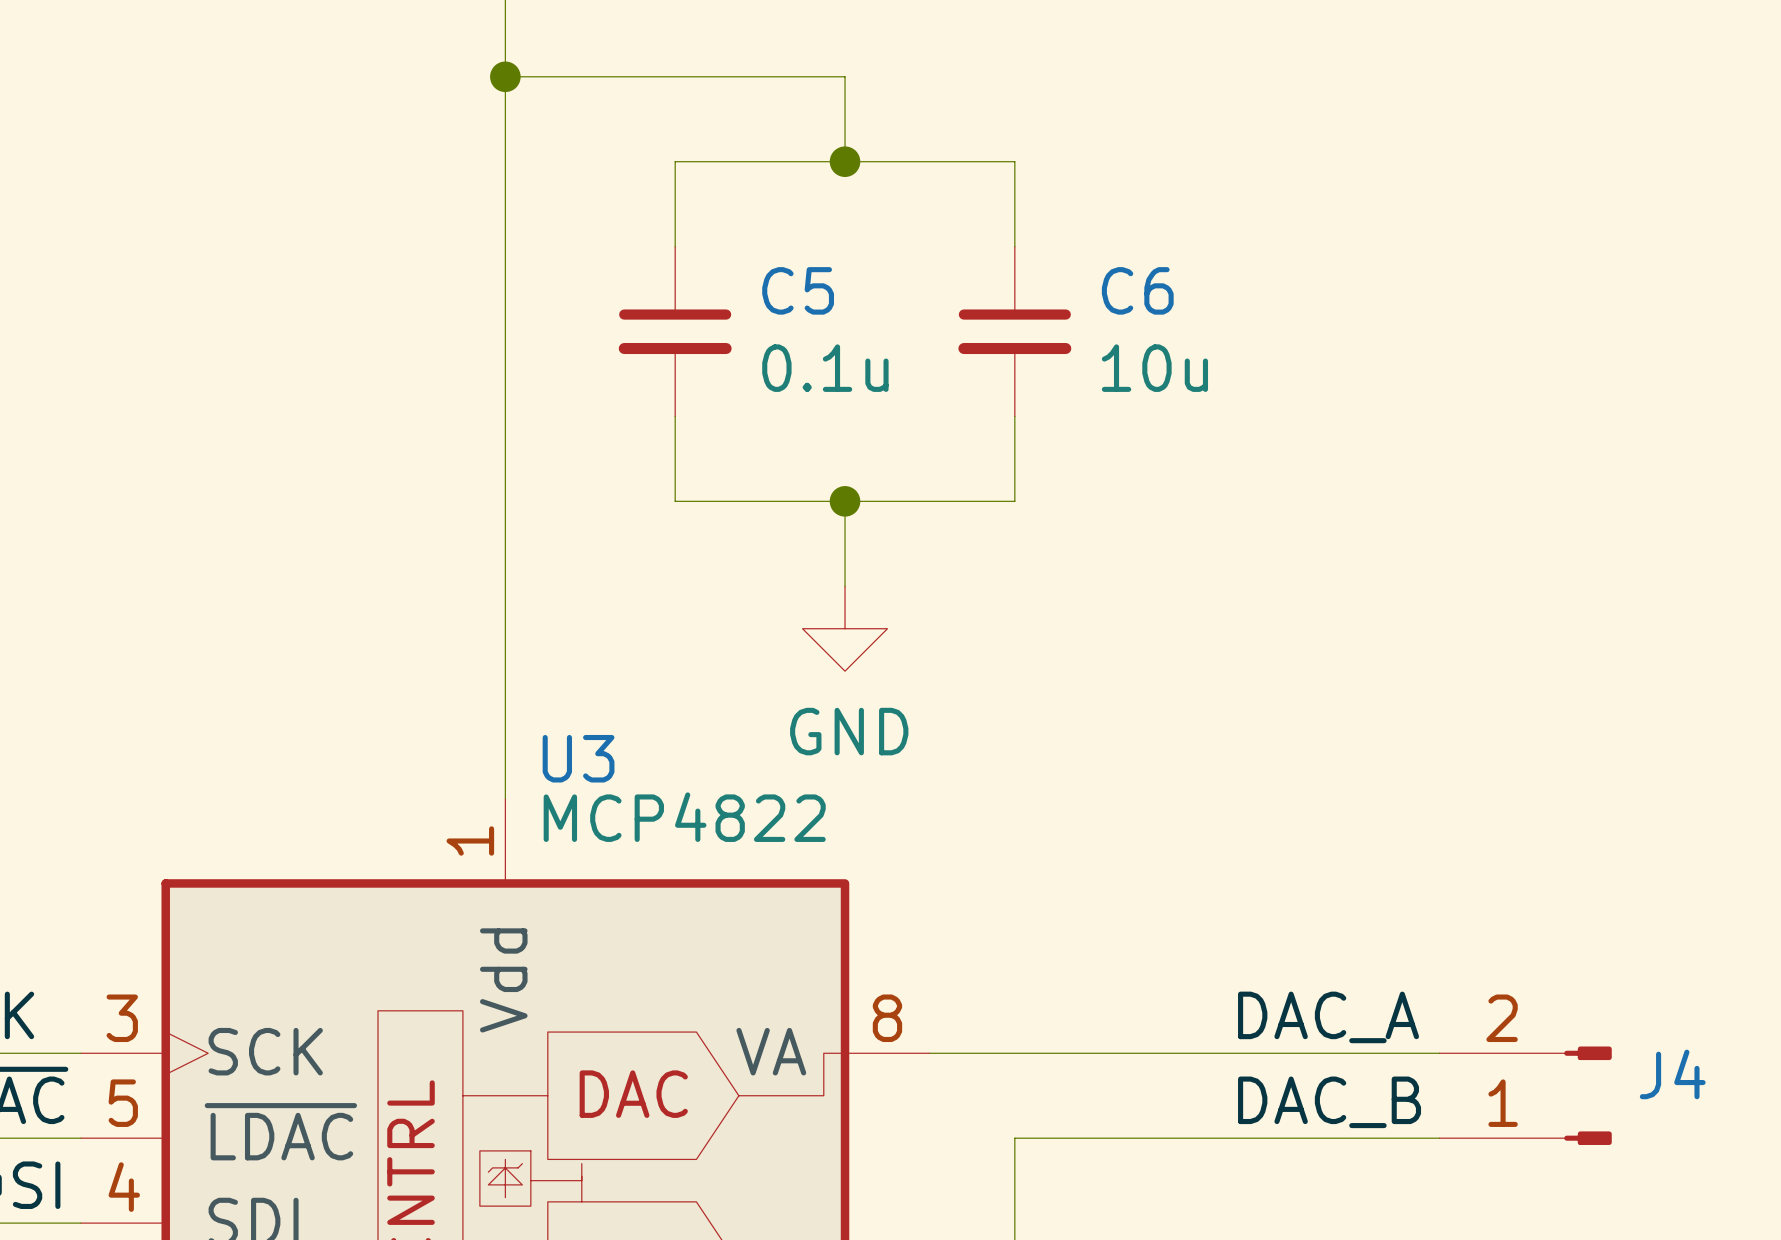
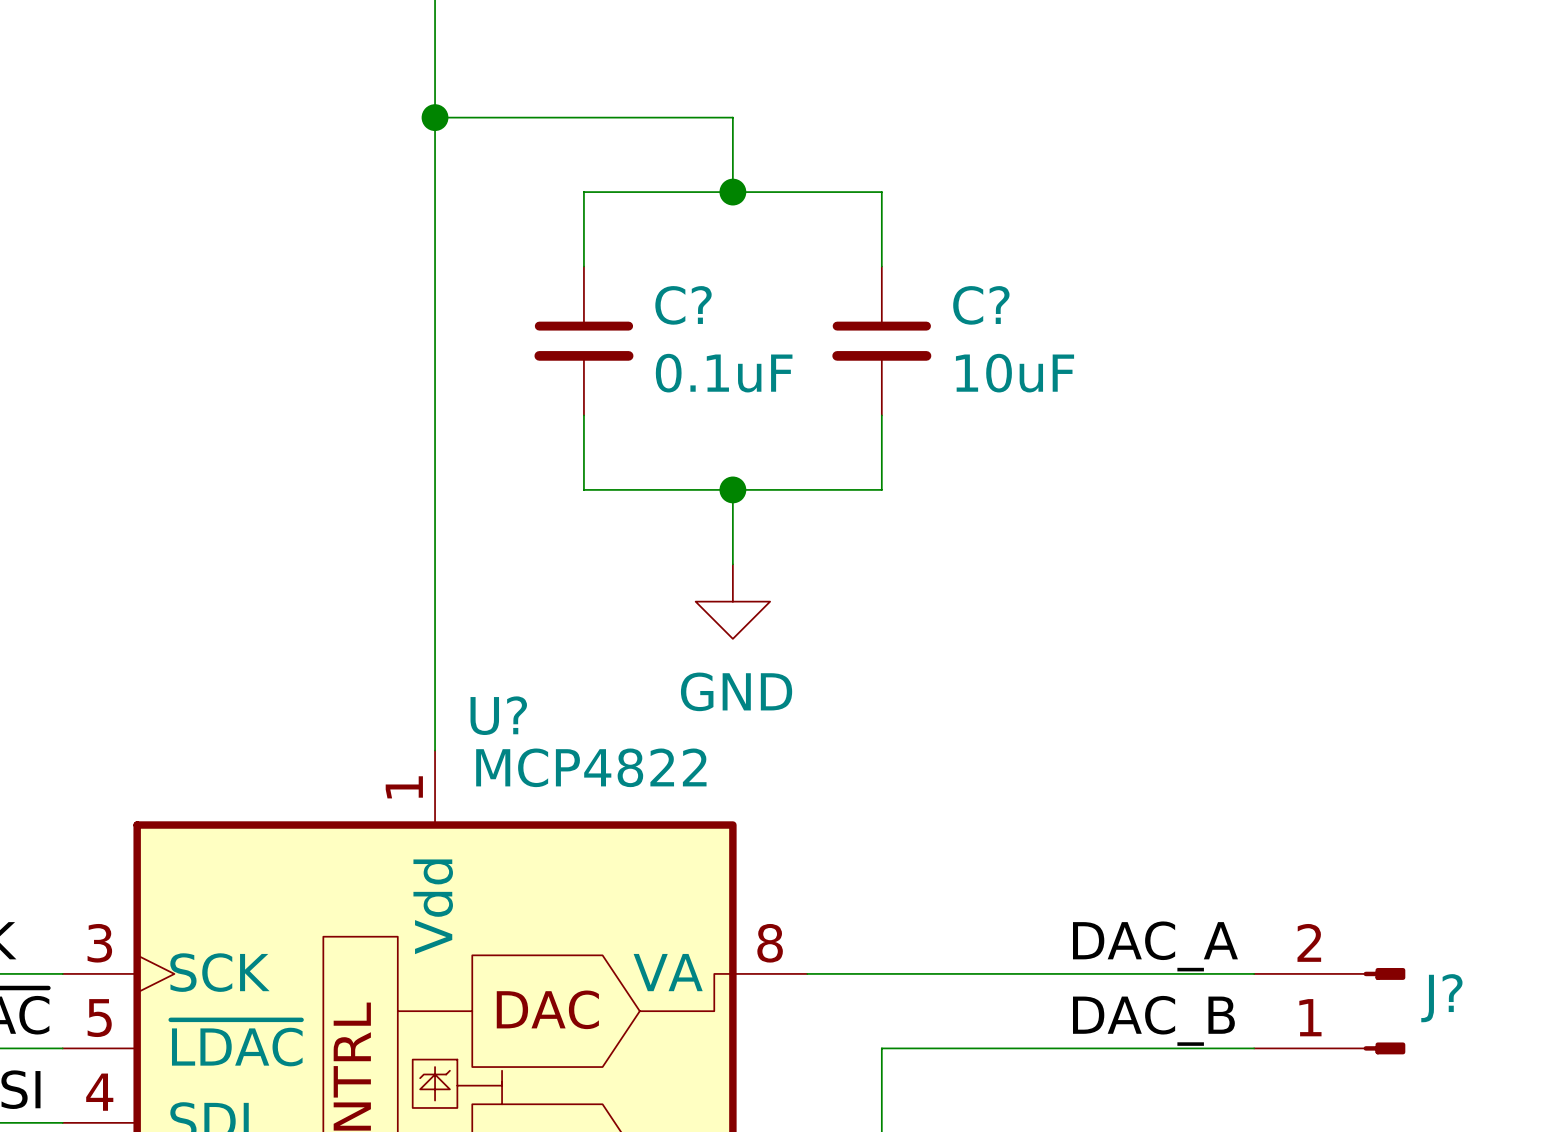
C5 name: C5 (798, 290) -> C? (683, 305)
C6 name: C6 (1137, 290) -> C? (981, 305)
C5 value: 0.1u (825, 368) -> 0.1uF (724, 373)
C6 value: 10u (1154, 368) -> 10uF (1015, 373)
U3 name: U3 (578, 758) -> U? (498, 715)
J4 name: J4 (1672, 1074) -> J? (1441, 998)

